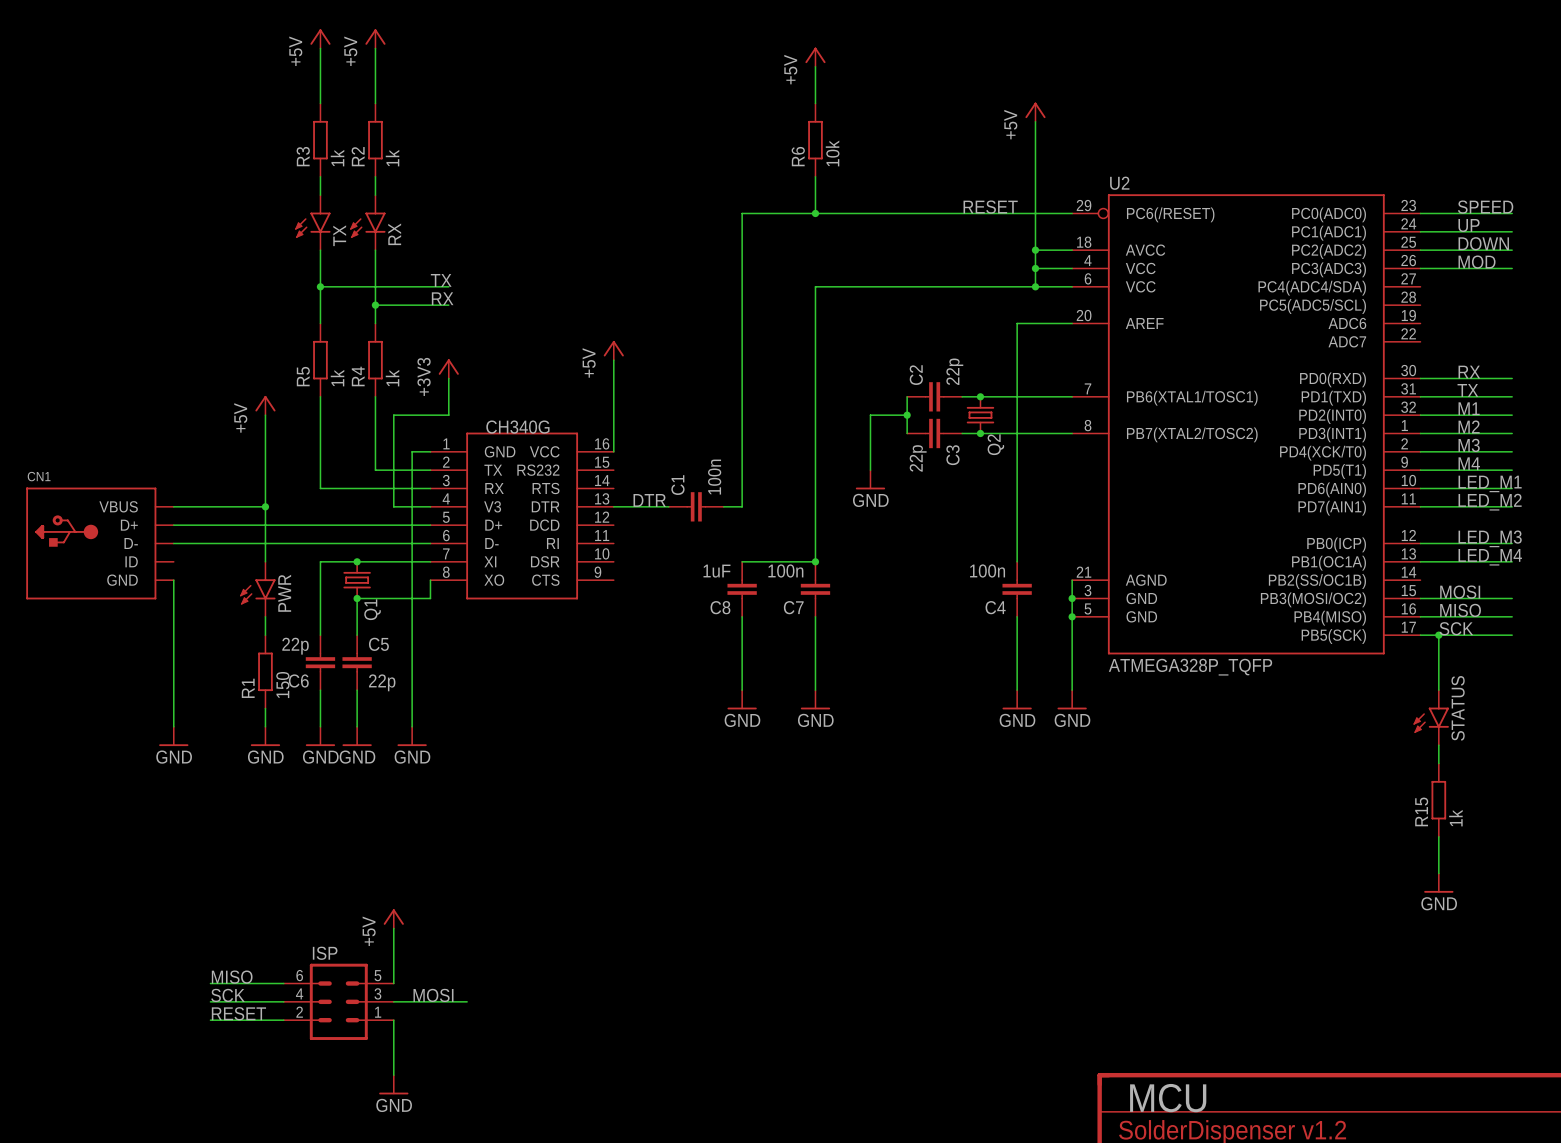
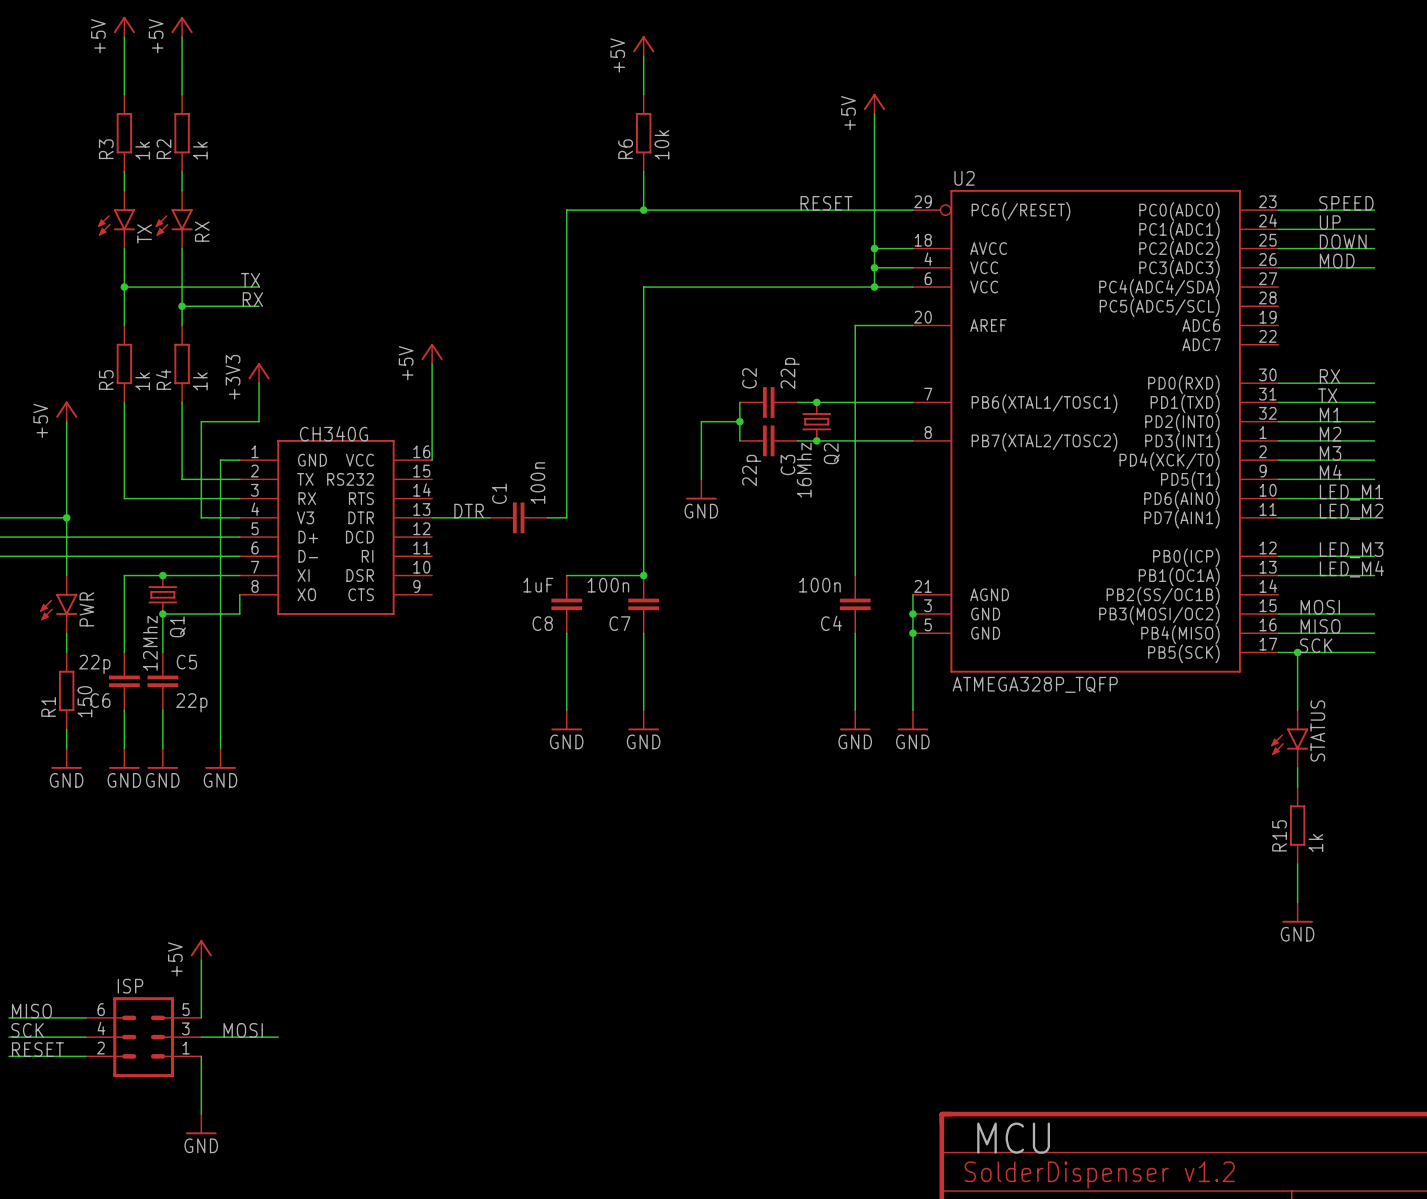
Q2 value: none -> 16Mhz (804, 470)
Q1 value: none -> 12Mhz (150, 643)

